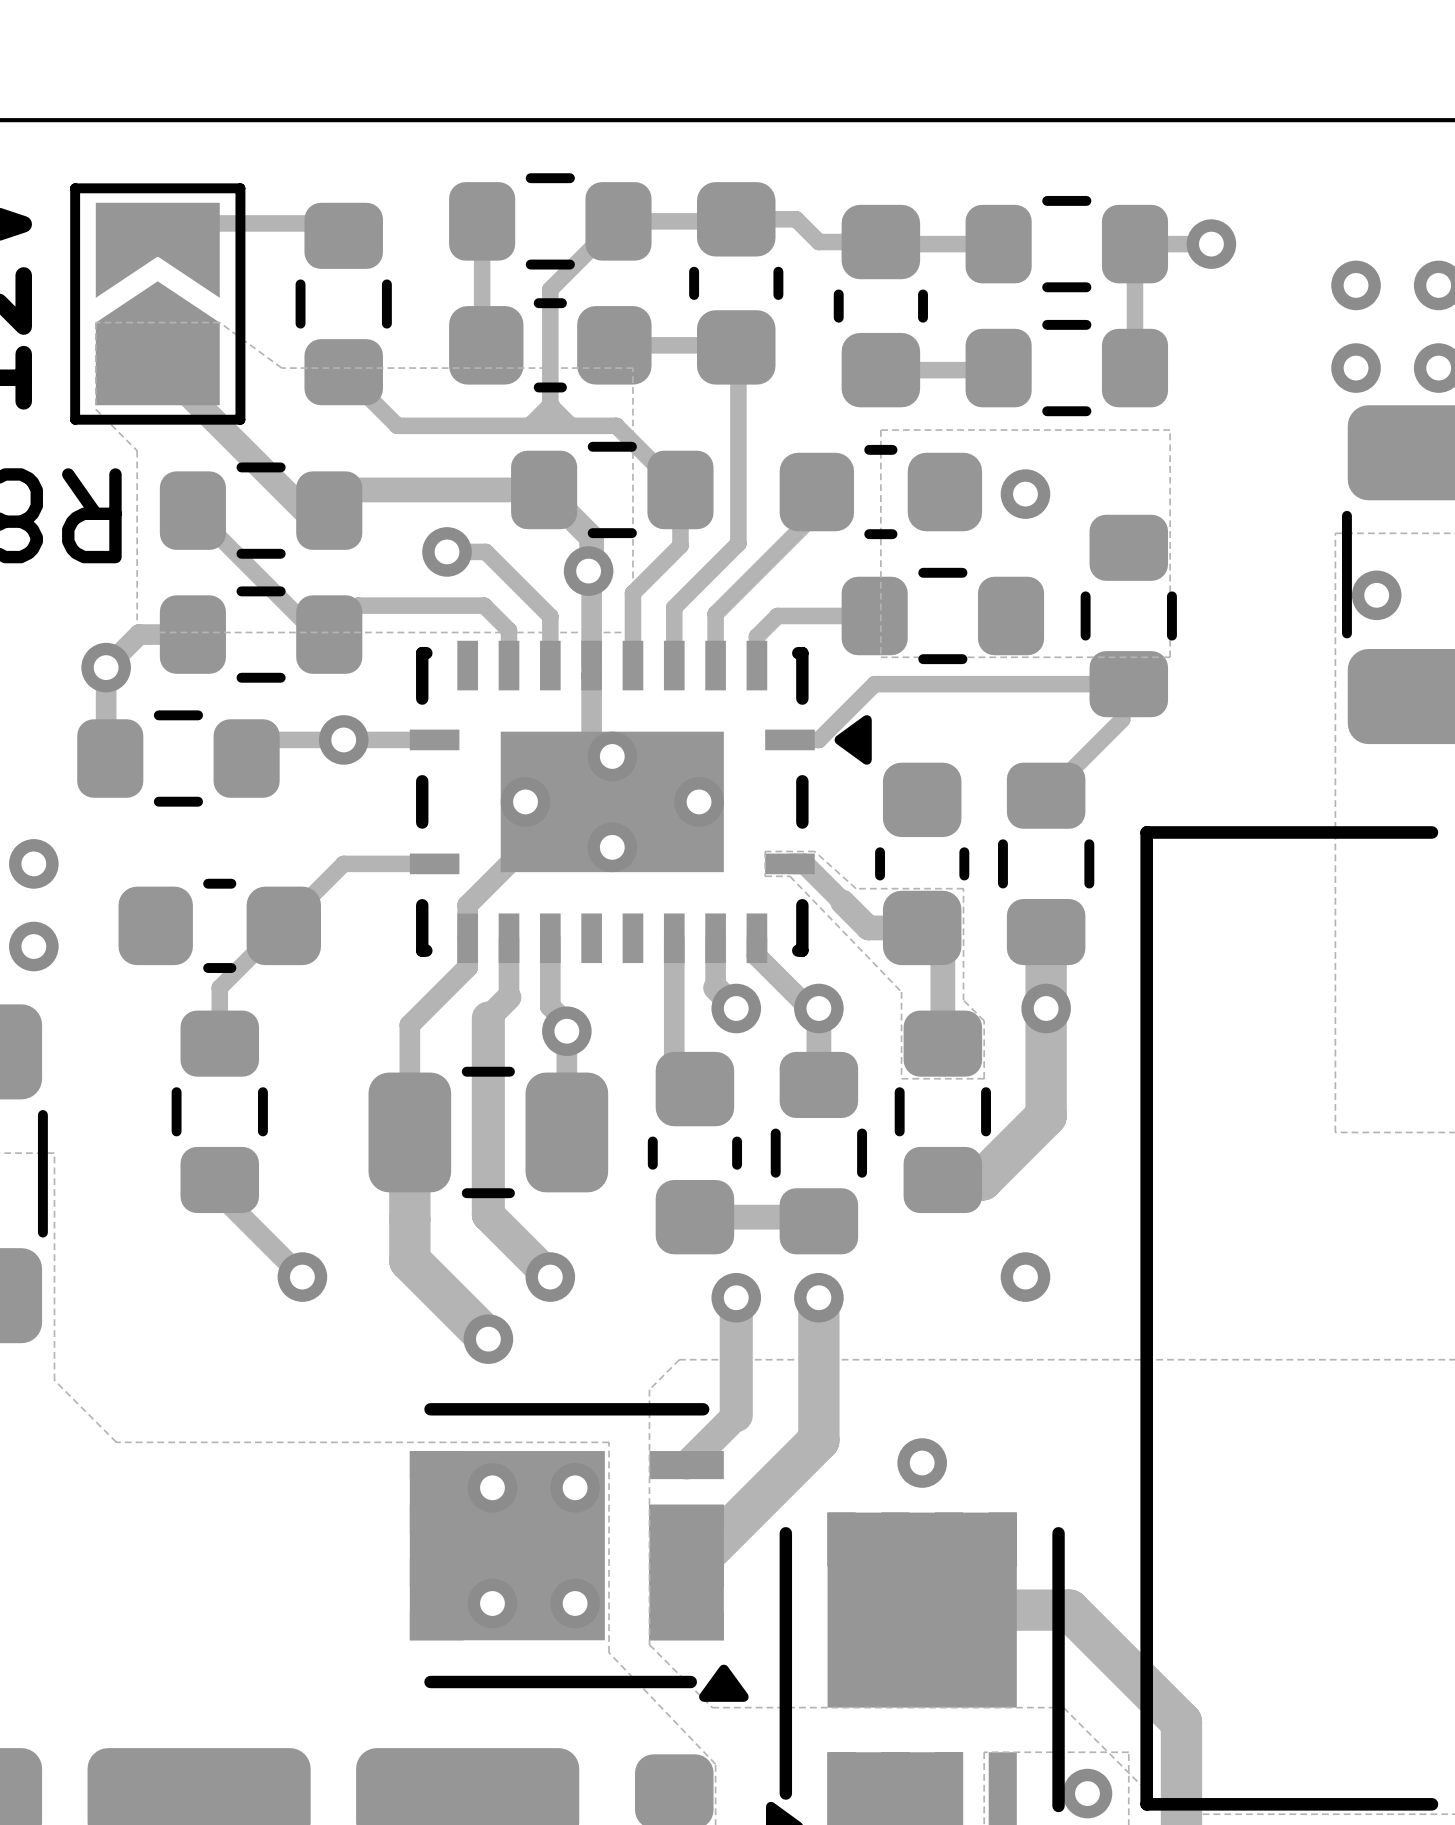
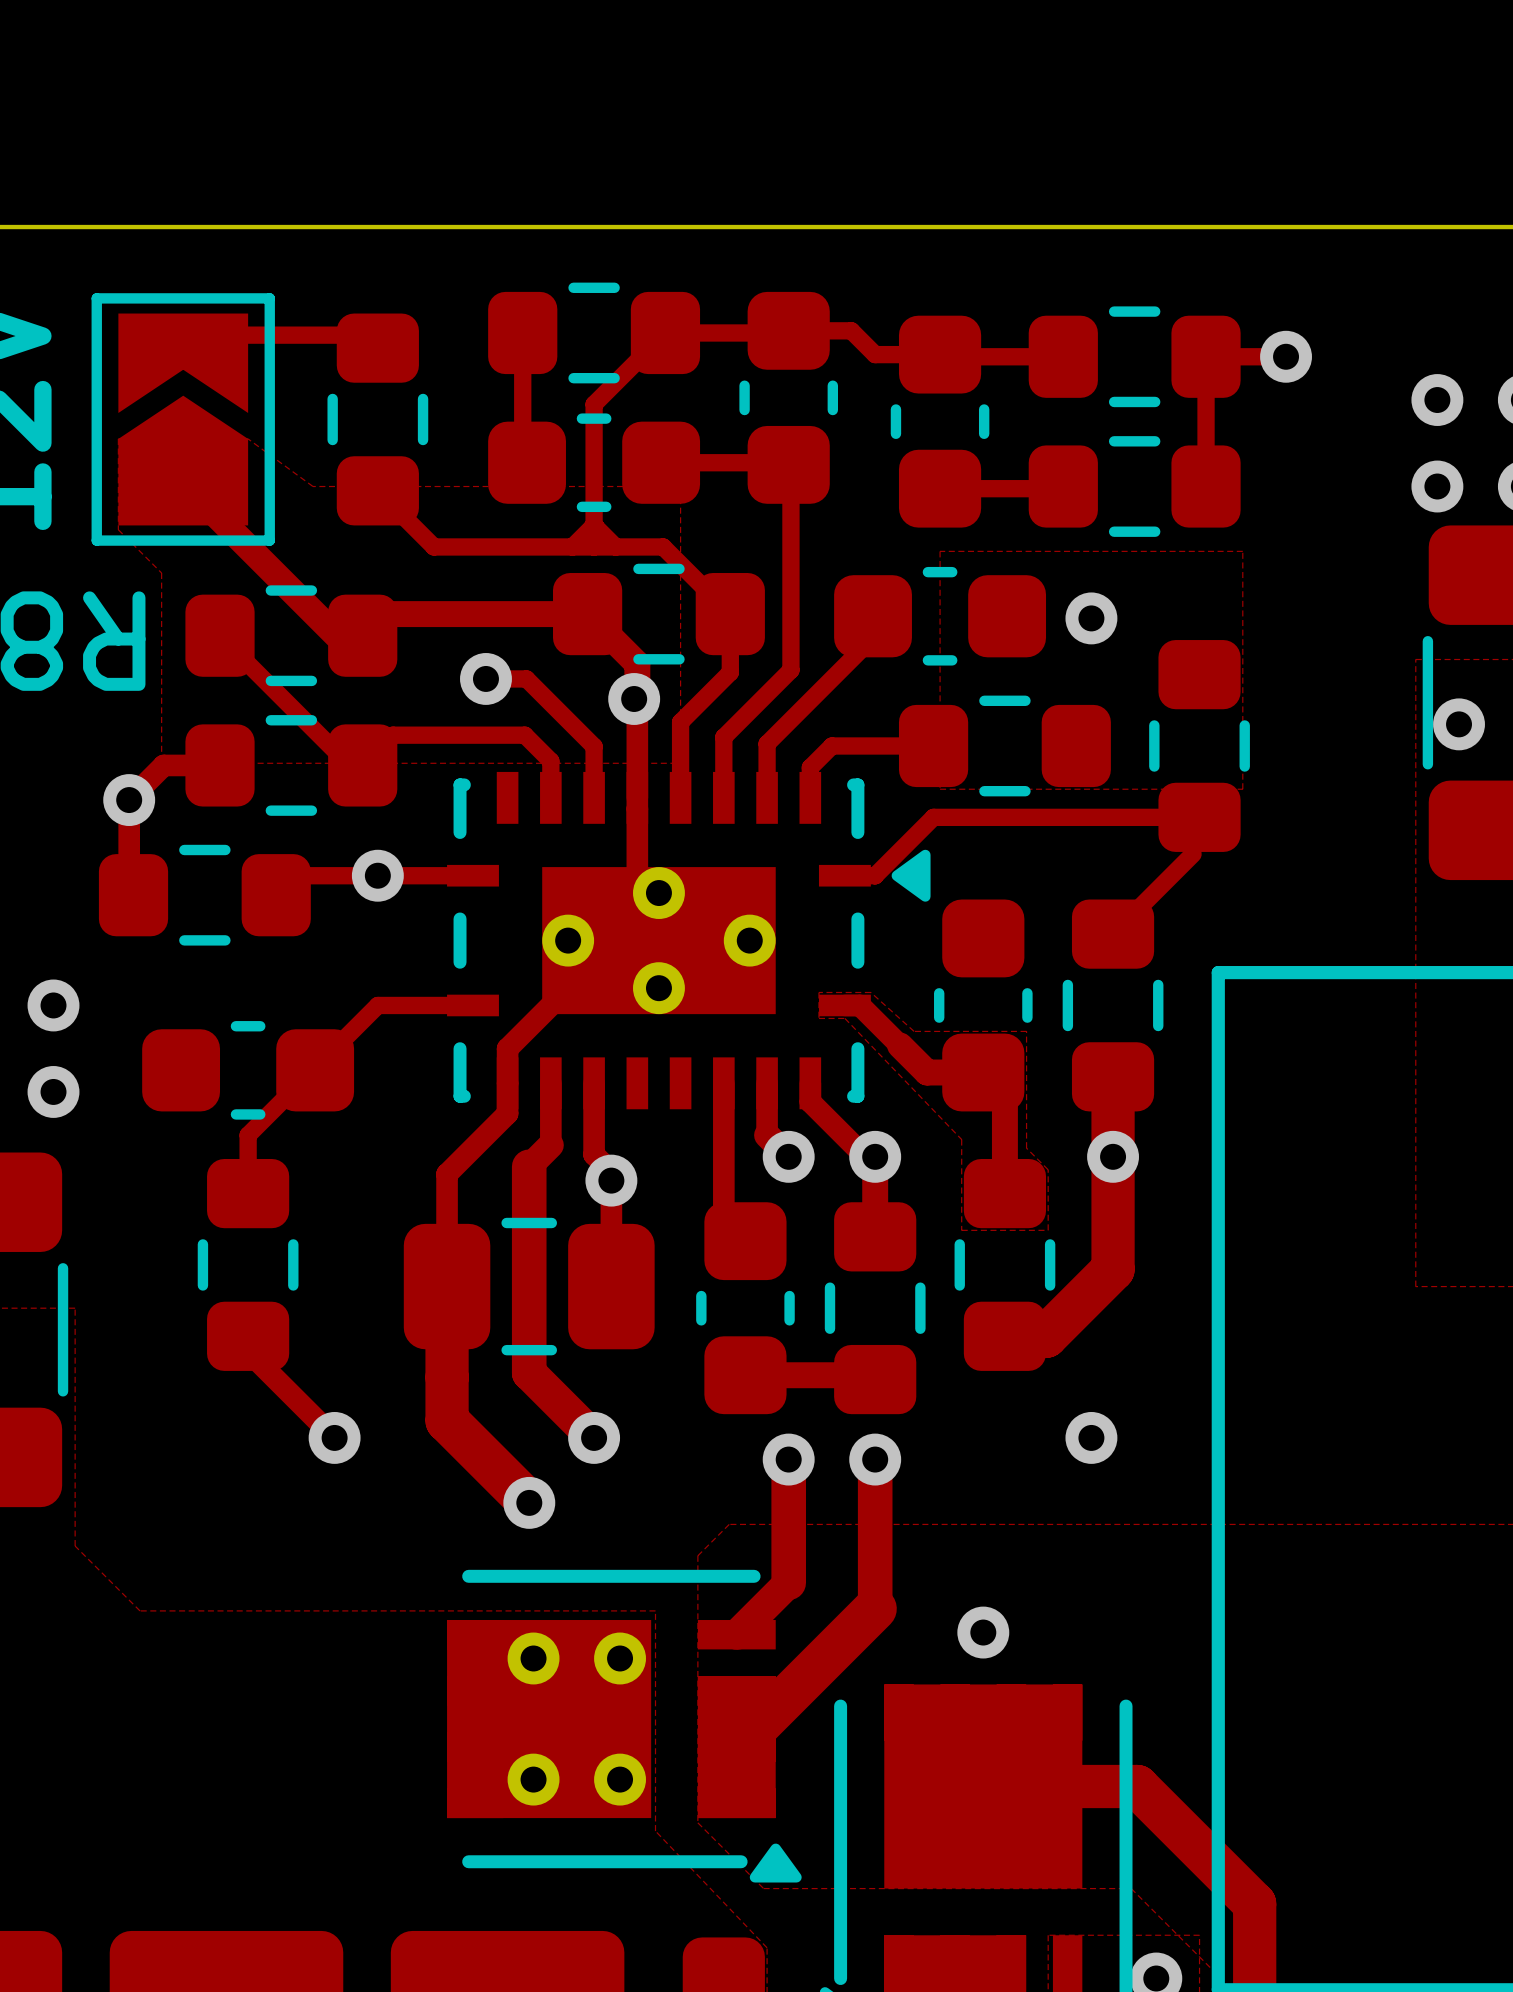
track width: thick (818, 1297) (818, 1440) -> thin (875, 1459) (875, 1608)

